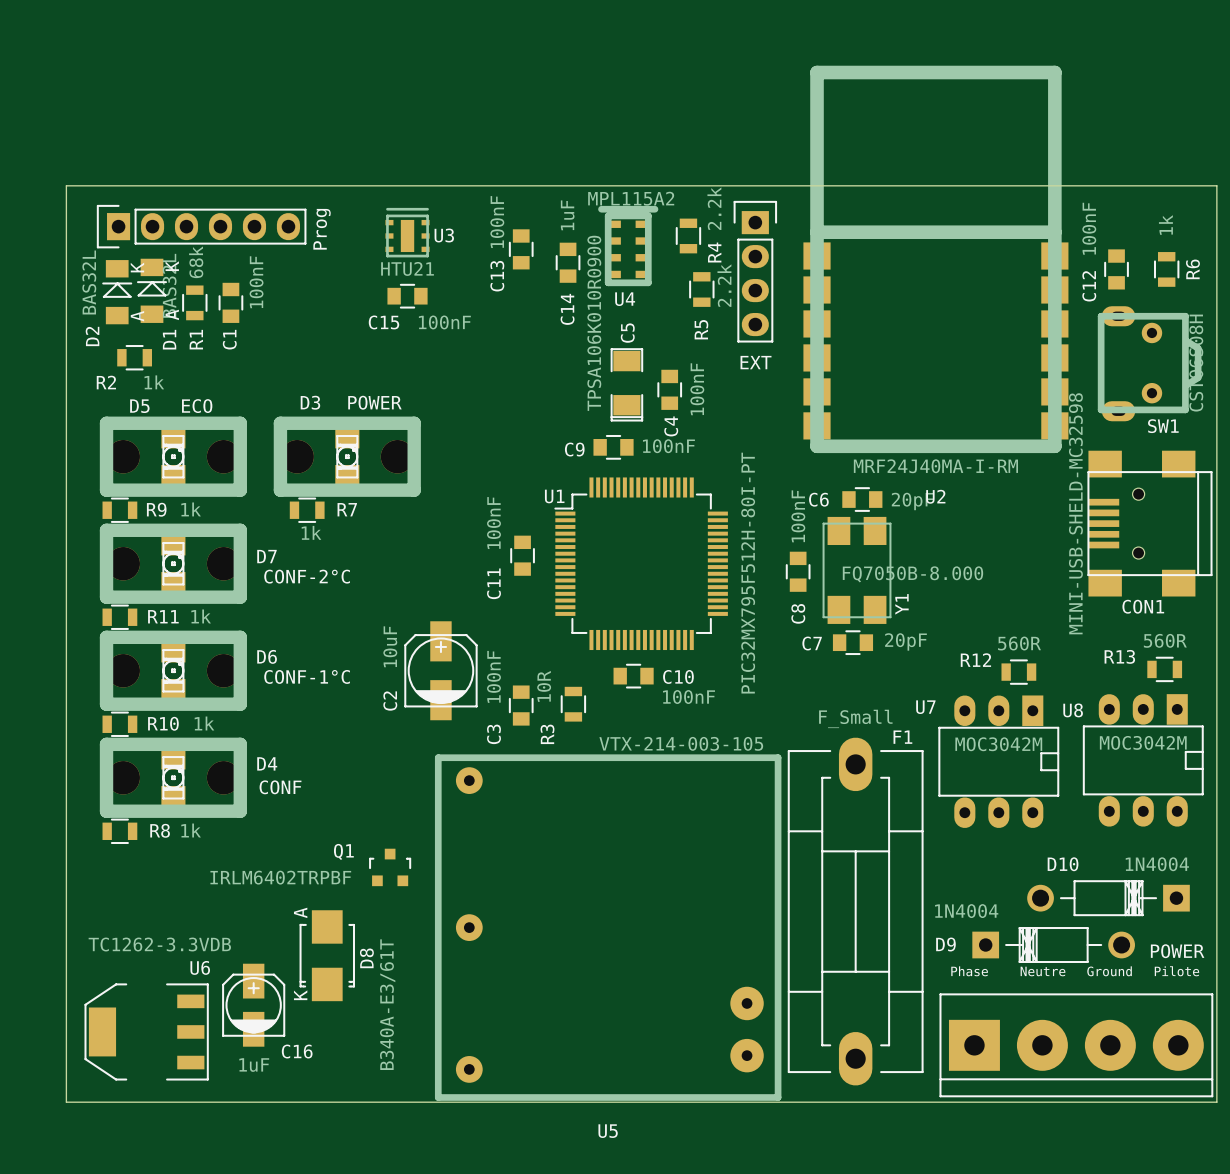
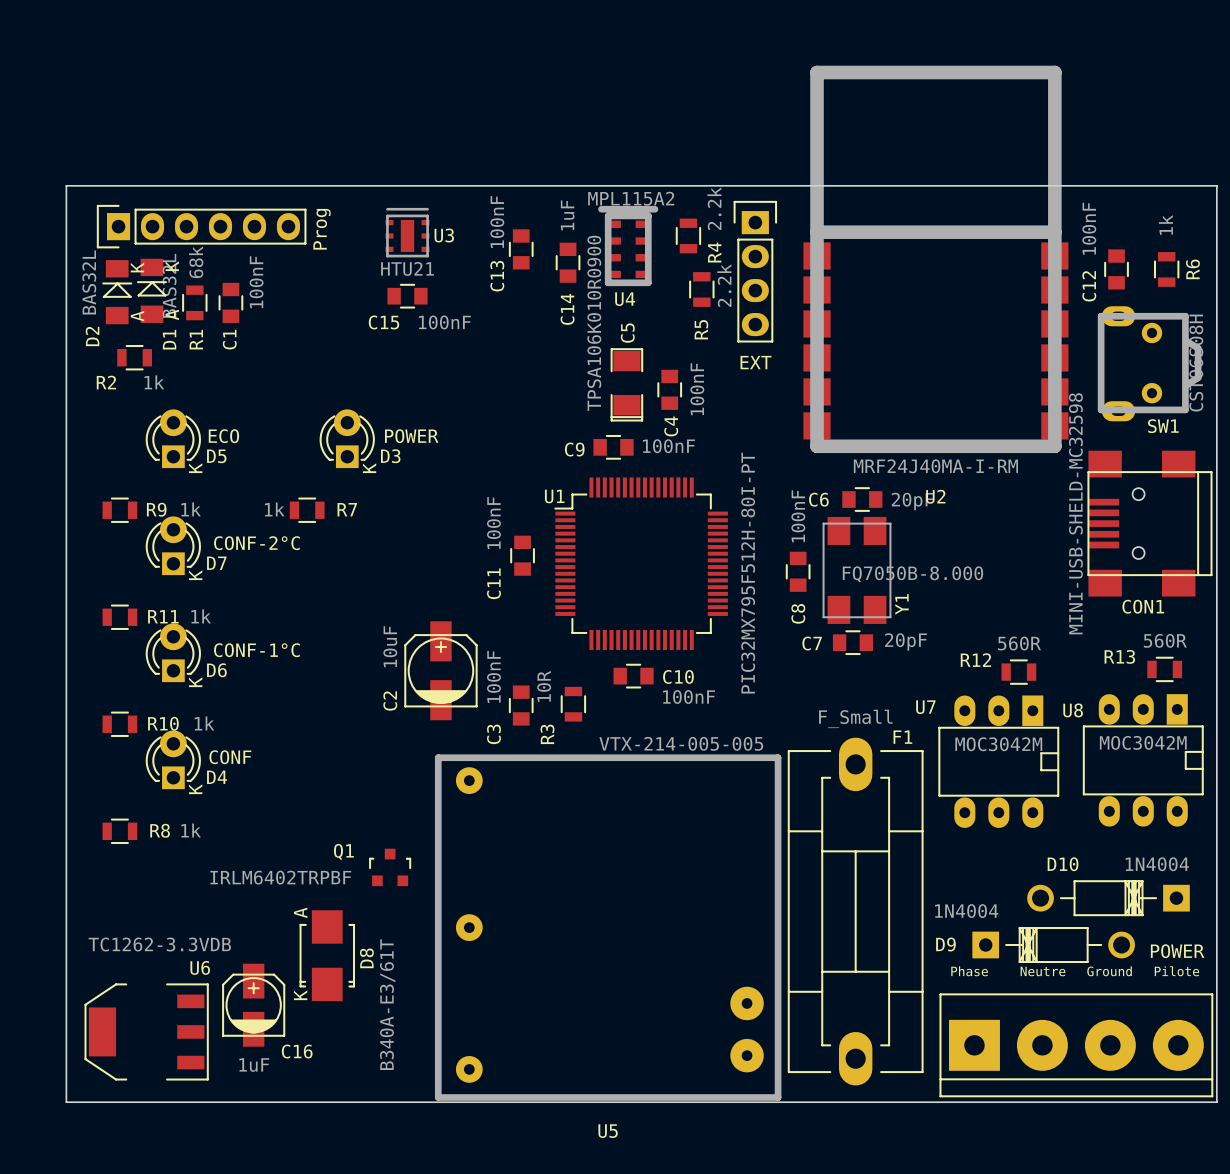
D3 name position: D3 (310, 402) -> D3 (390, 456)
D3 value position: POWER (374, 402) -> POWER (411, 436)
D5 name position: D5 (139, 406) -> D5 (216, 456)
D5 value position: ECO (197, 406) -> ECO (223, 436)
D5 footprint: [99, 416, 247, 497] -> [145, 409, 201, 469]
D3 footprint: [273, 416, 421, 497] -> [319, 409, 375, 469]
D7 footprint: [99, 523, 247, 604] -> [145, 516, 201, 576]
R7 value position: 1k (311, 532) -> 1k (274, 509)
D7 name position: D7 (266, 556) -> D7 (216, 563)
D7 value position: CONF-2°C (307, 576) -> CONF-2°C (256, 543)
D6 footprint: [99, 630, 247, 711] -> [145, 623, 201, 683]
D6 name position: D6 (267, 656) -> D6 (216, 670)
D6 value position: CONF-1°C (307, 676) -> CONF-1°C (256, 650)
D4 footprint: [99, 737, 247, 818] -> [145, 730, 201, 790]
U5 value: VTX-214-003-105 (681, 743) -> VTX-214-005-005 (681, 743)
D4 name position: D4 (267, 763) -> D4 (217, 777)
D4 value position: CONF (280, 787) -> CONF (230, 757)

